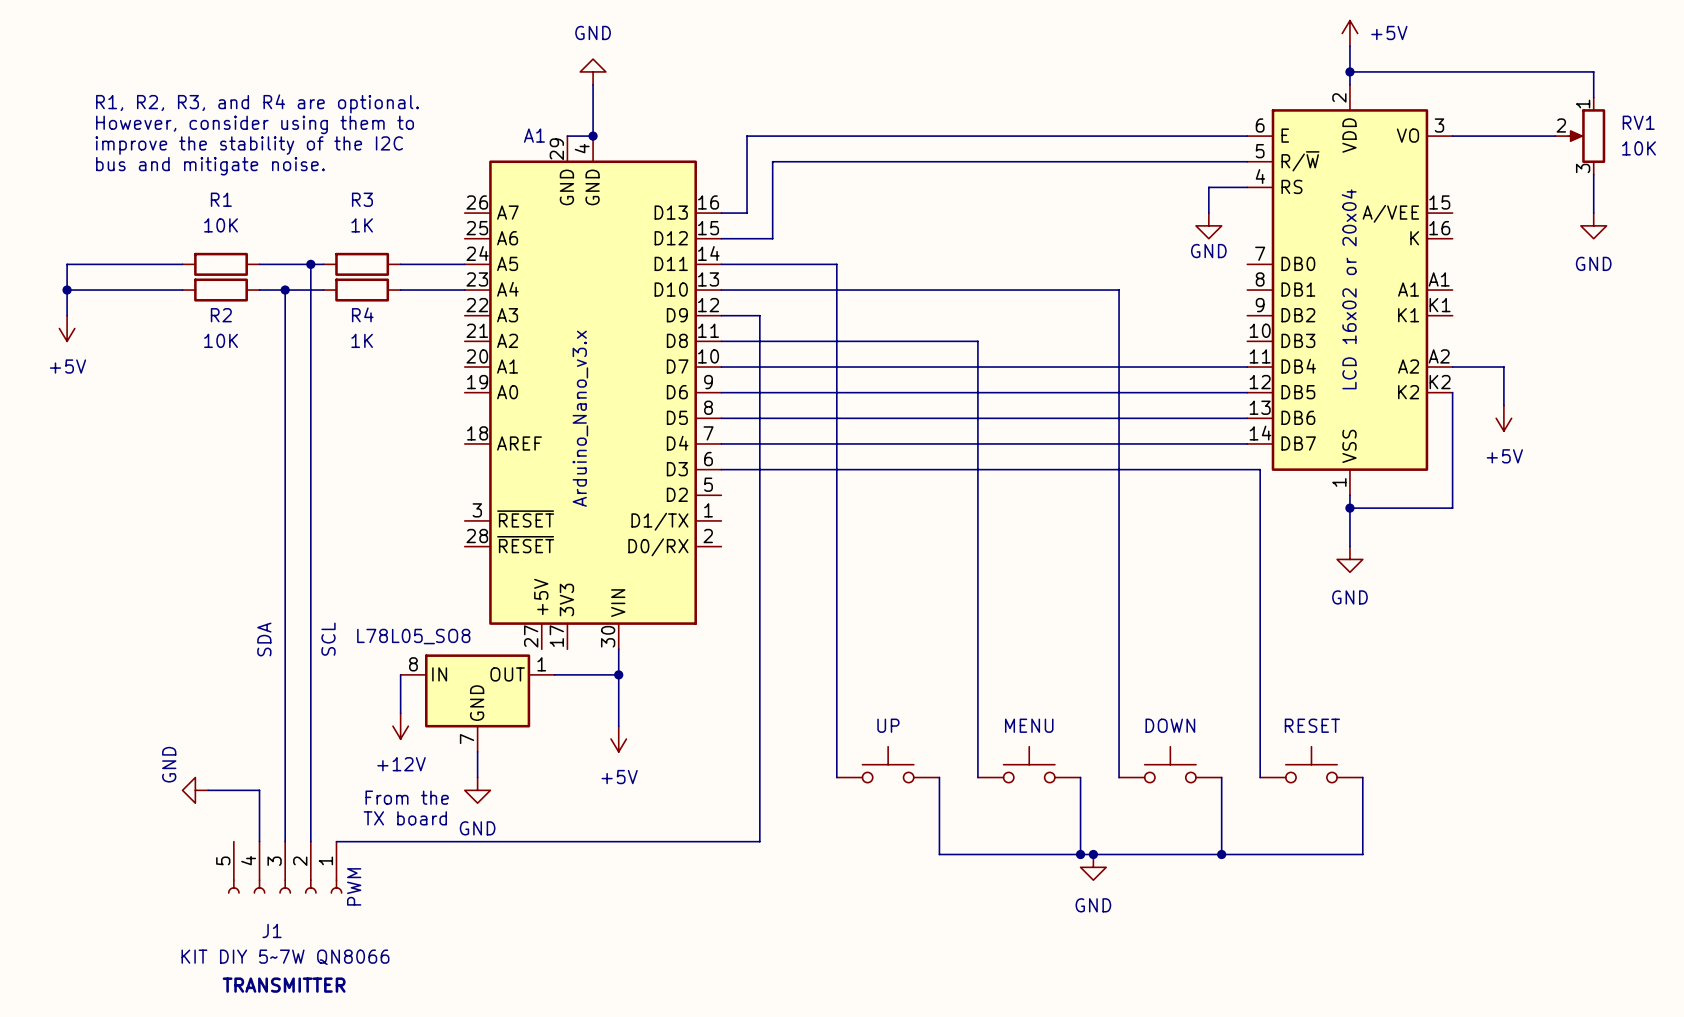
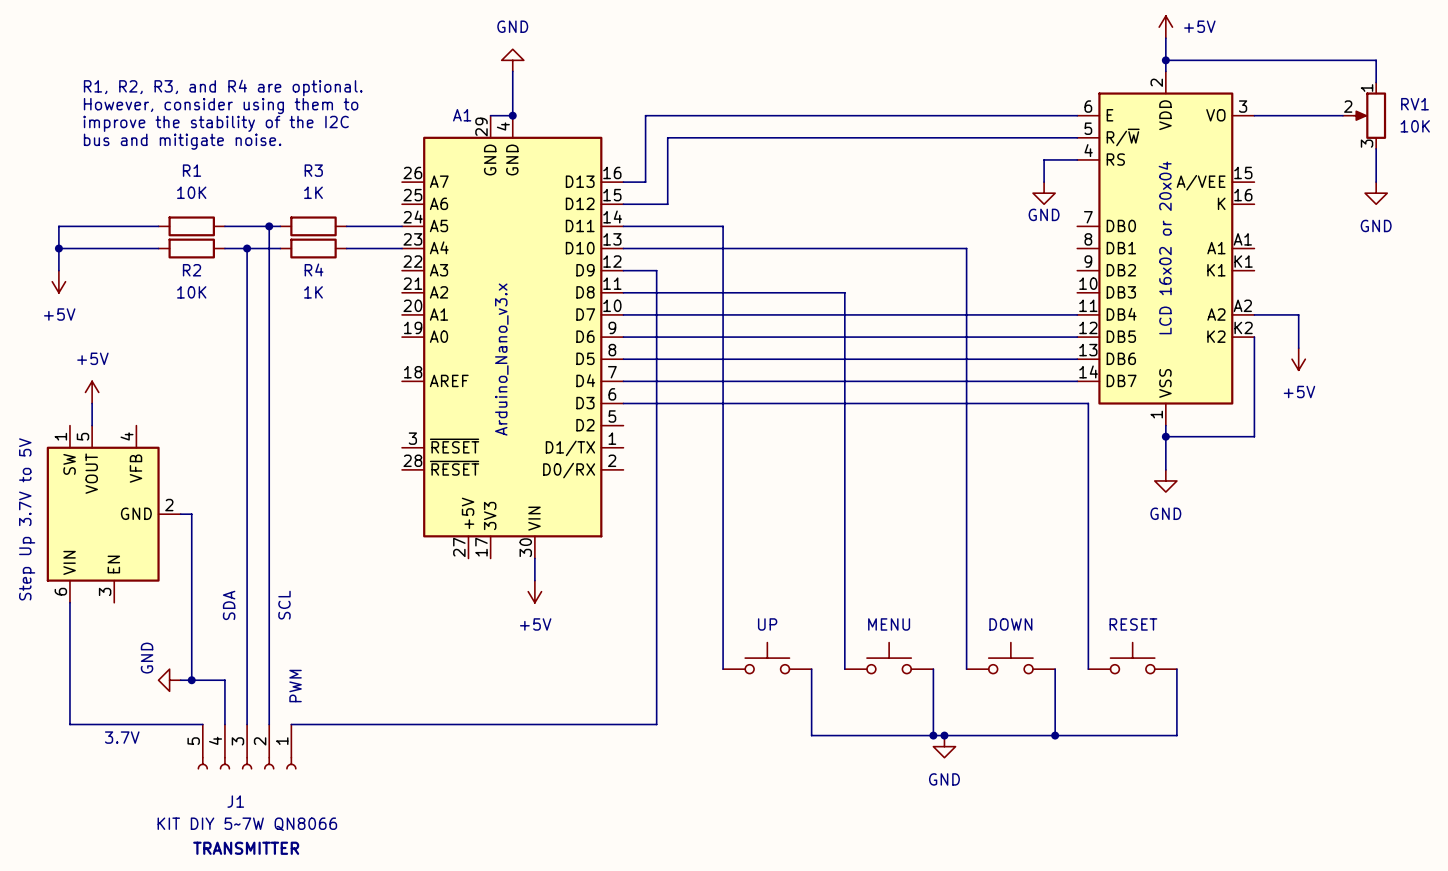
power symbol: none -> +5V (92, 392)
wire: none -> (92, 403) (92, 425)
part: none -> Step Up 3.7V to 5V (113, 514)
wire: none -> (180, 514) (191, 514) (191, 680)
text position: SDA (264, 639) -> SDA (229, 605)
text position: SCL (328, 639) -> SCL (284, 605)
wire: (400, 674) (400, 713) -> none
wire: (554, 674) (618, 674) (618, 726) -> none
junction: (618, 674) -> none
wire: none -> (69, 602) (69, 724) (202, 724)
part: L78L05_SO8 (477, 703) -> none
power symbol: +12V (400, 726) -> none
power symbol position: +5V (618, 739) -> +5V (534, 591)
wire: (477, 751) (477, 777) -> none
junction: none -> (191, 680)
power symbol: GND (477, 790) -> none
text: From the (407, 797) -> none
text: TX board (405, 818) -> none
text: none -> 3.7V (122, 737)
text position: PWM (354, 886) -> PWM (295, 686)

